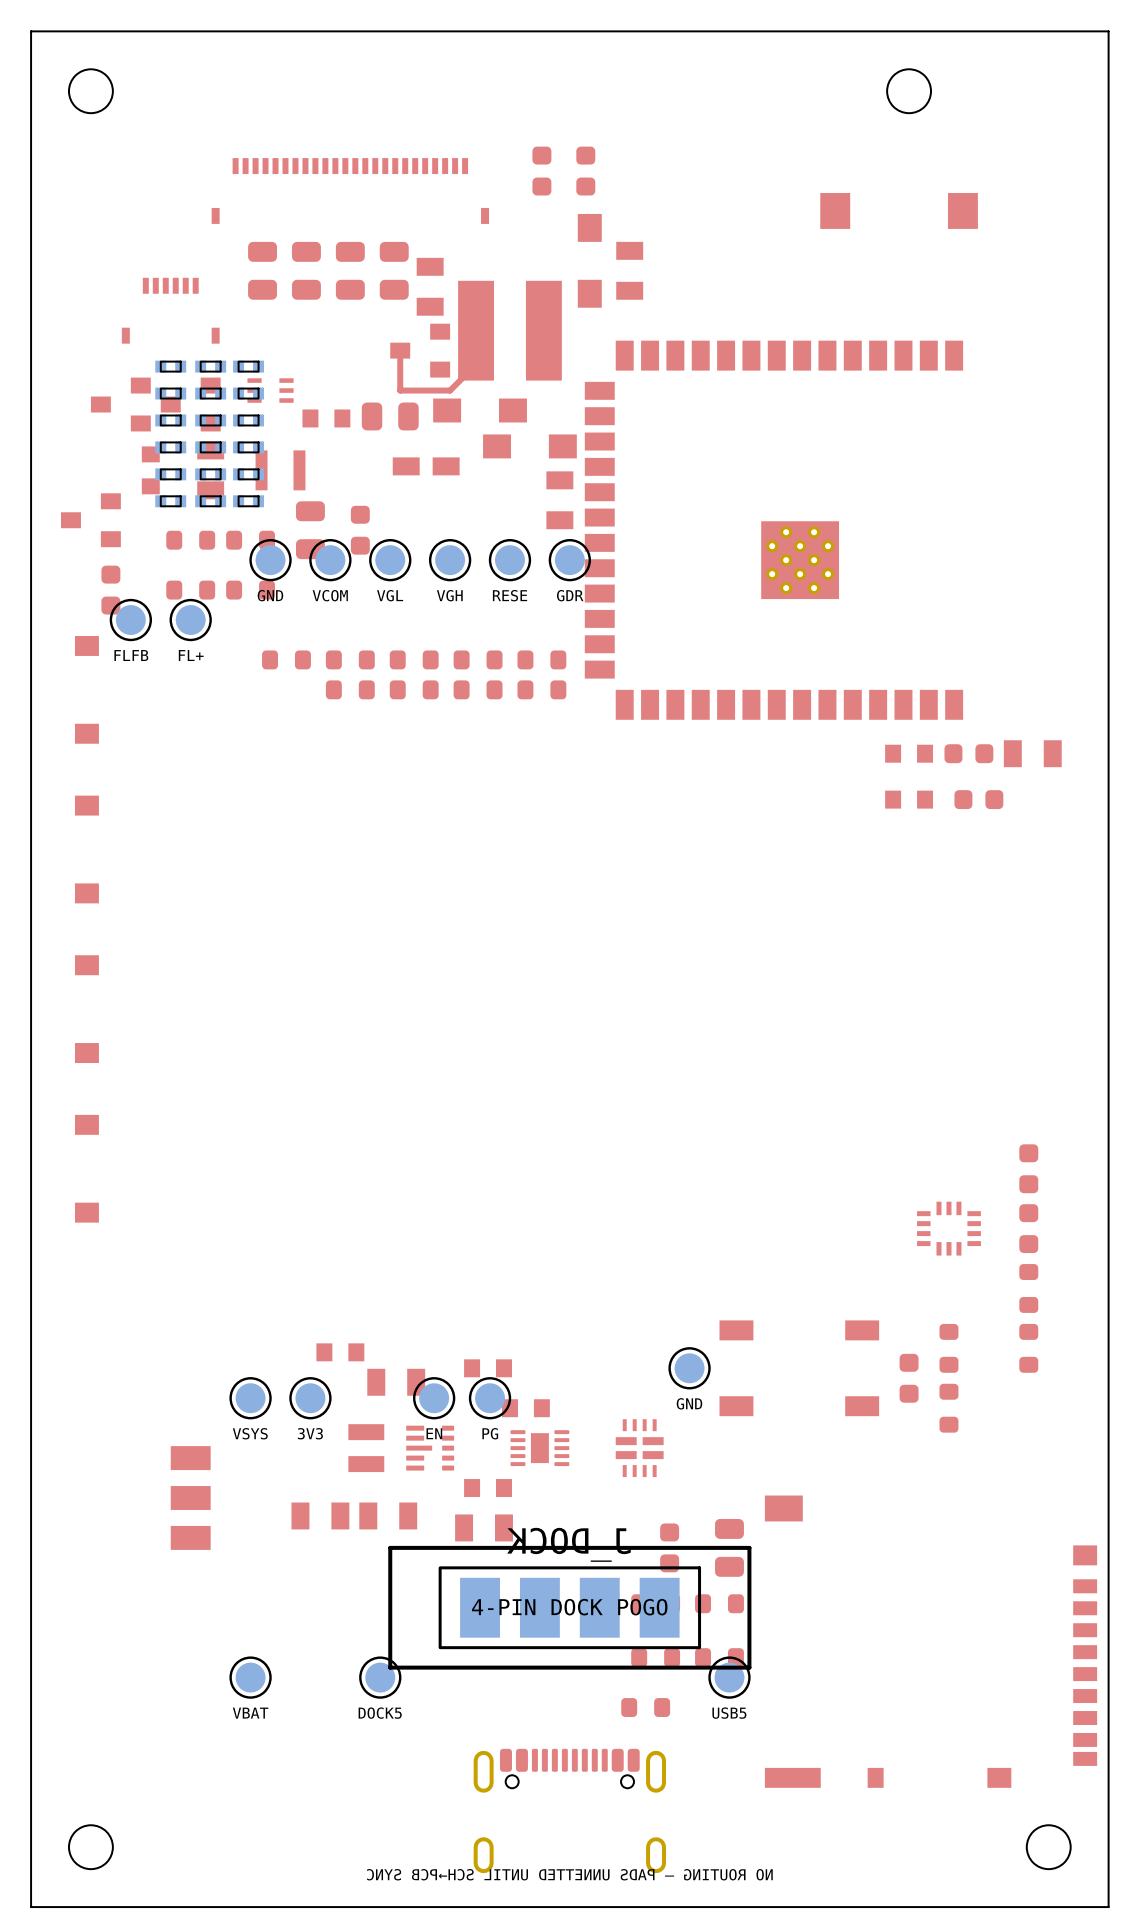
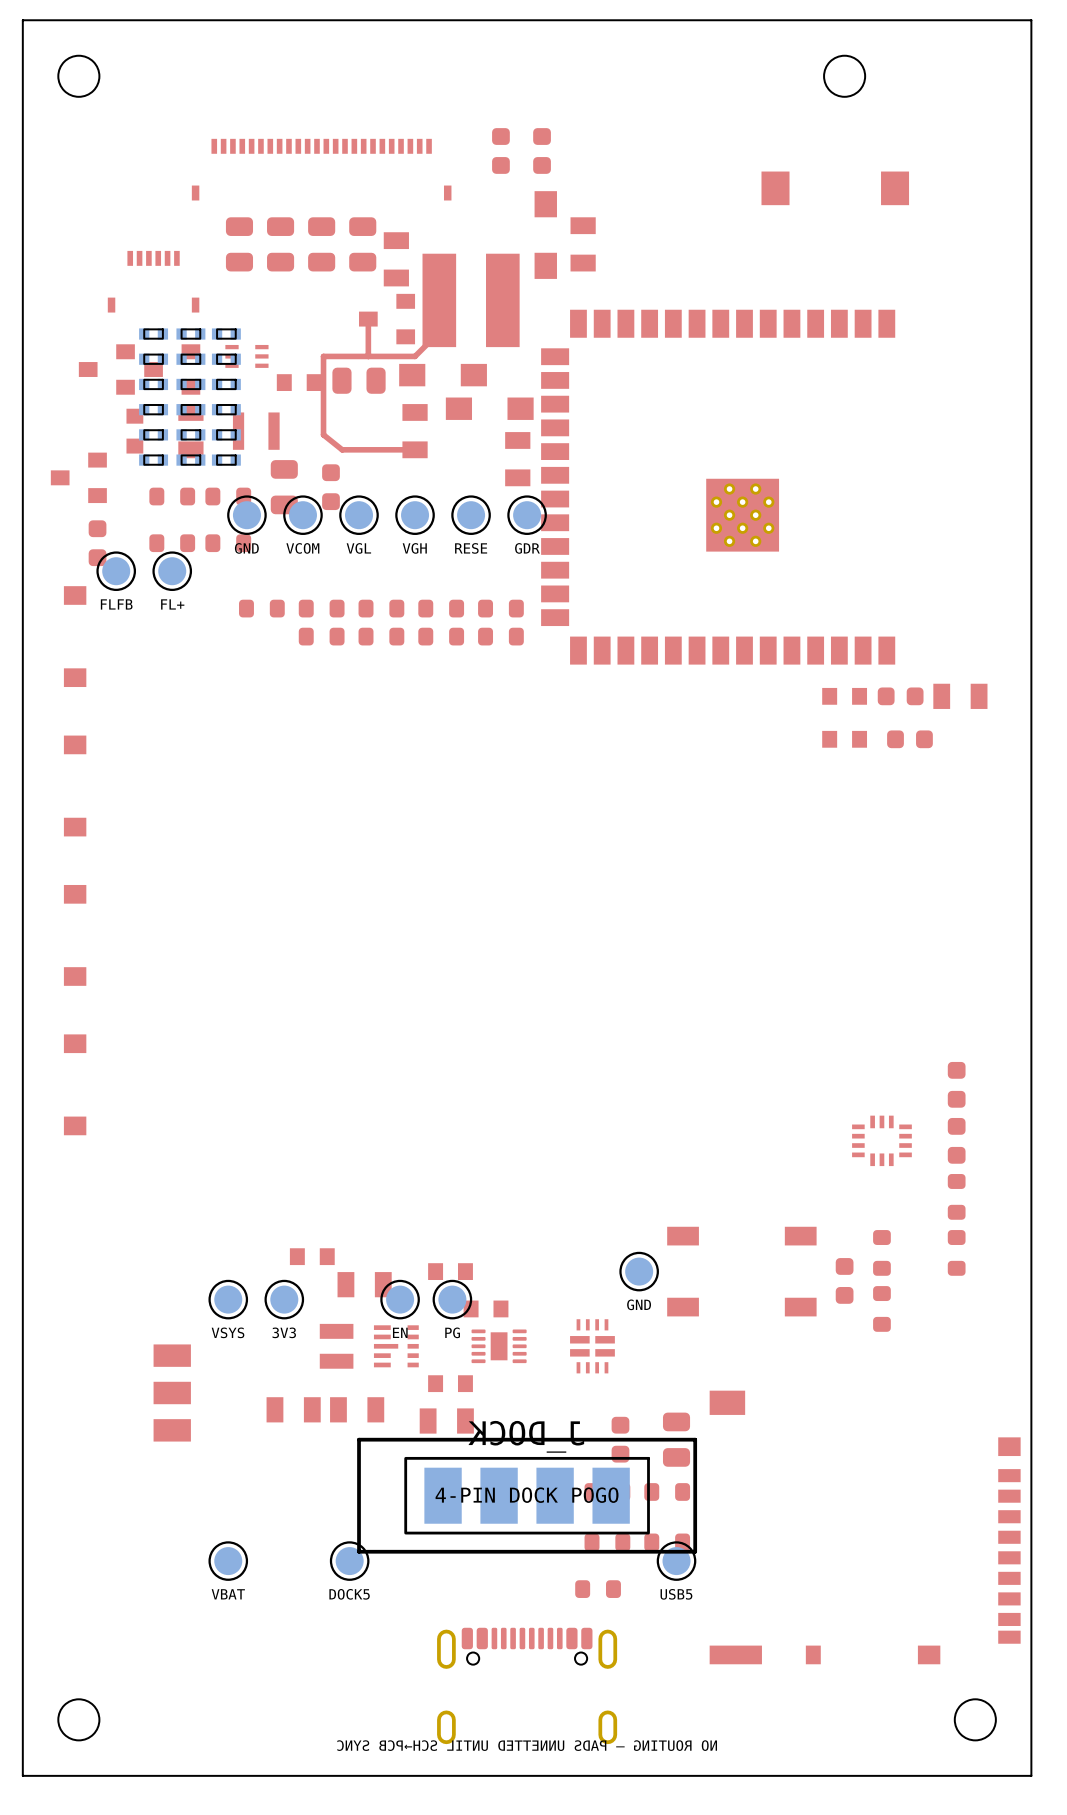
top track: none -> (368, 356) (323, 356) (323, 434) (342, 449) (415, 449)
part: (426, 466) -> none
part: none -> (415, 431)

